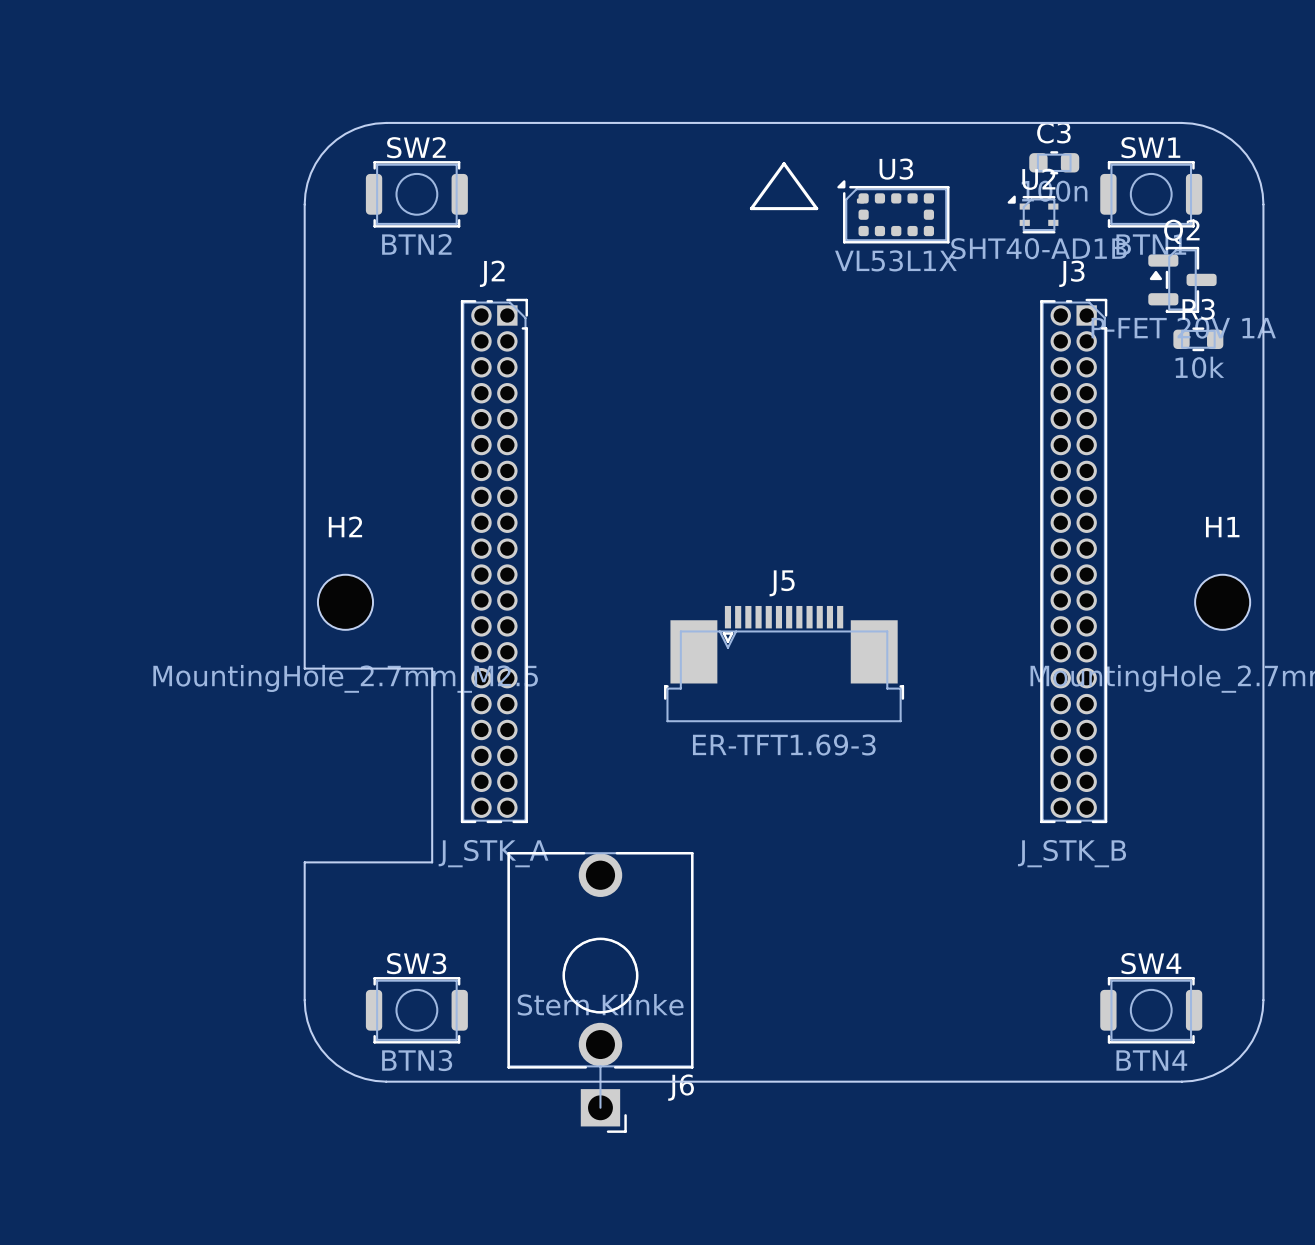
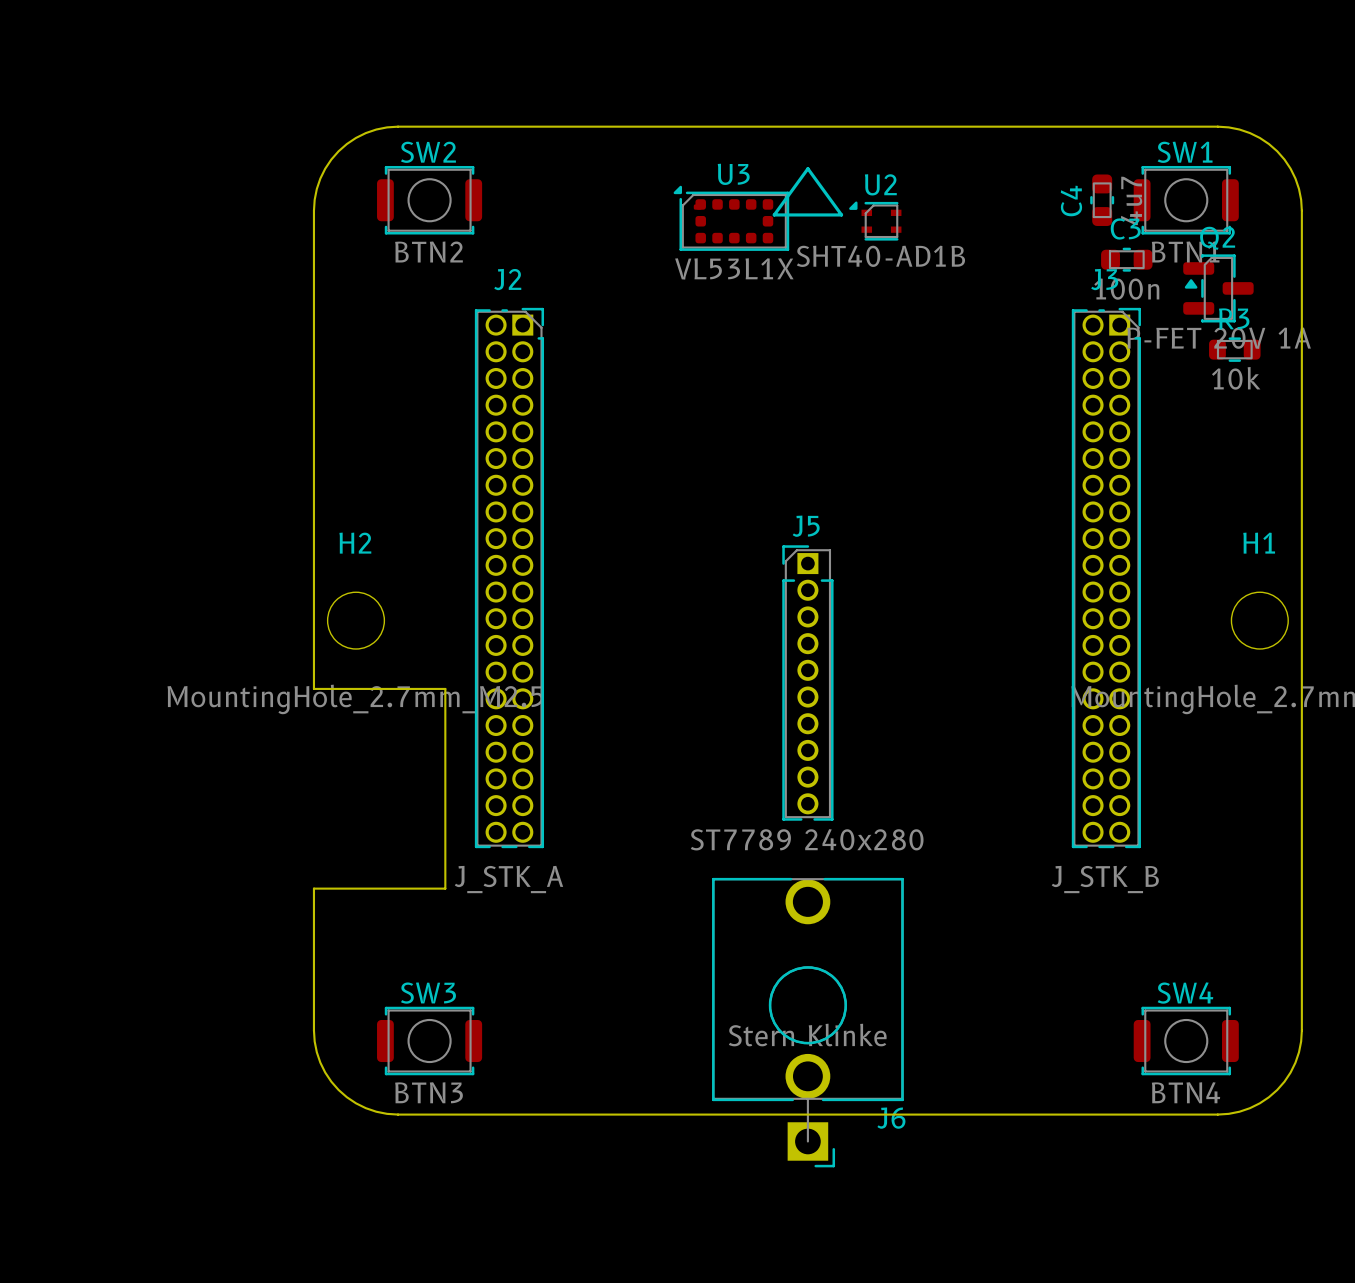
C3 position: (1054, 162) -> (1126, 259)
C4: none -> 4u7 (1102, 200)
U3 position: (893, 211) -> (731, 218)
U2 position: (1033, 214) -> (875, 221)
J5 name position: J5 (782, 583) -> J5 (806, 526)
J5 footprint: [664, 605, 905, 723] -> [782, 545, 834, 821]
J5 value: ER-TFT1.69-3 (784, 744) -> ST7789 240x280 (807, 839)
J6 position: (600, 992) -> (807, 1022)

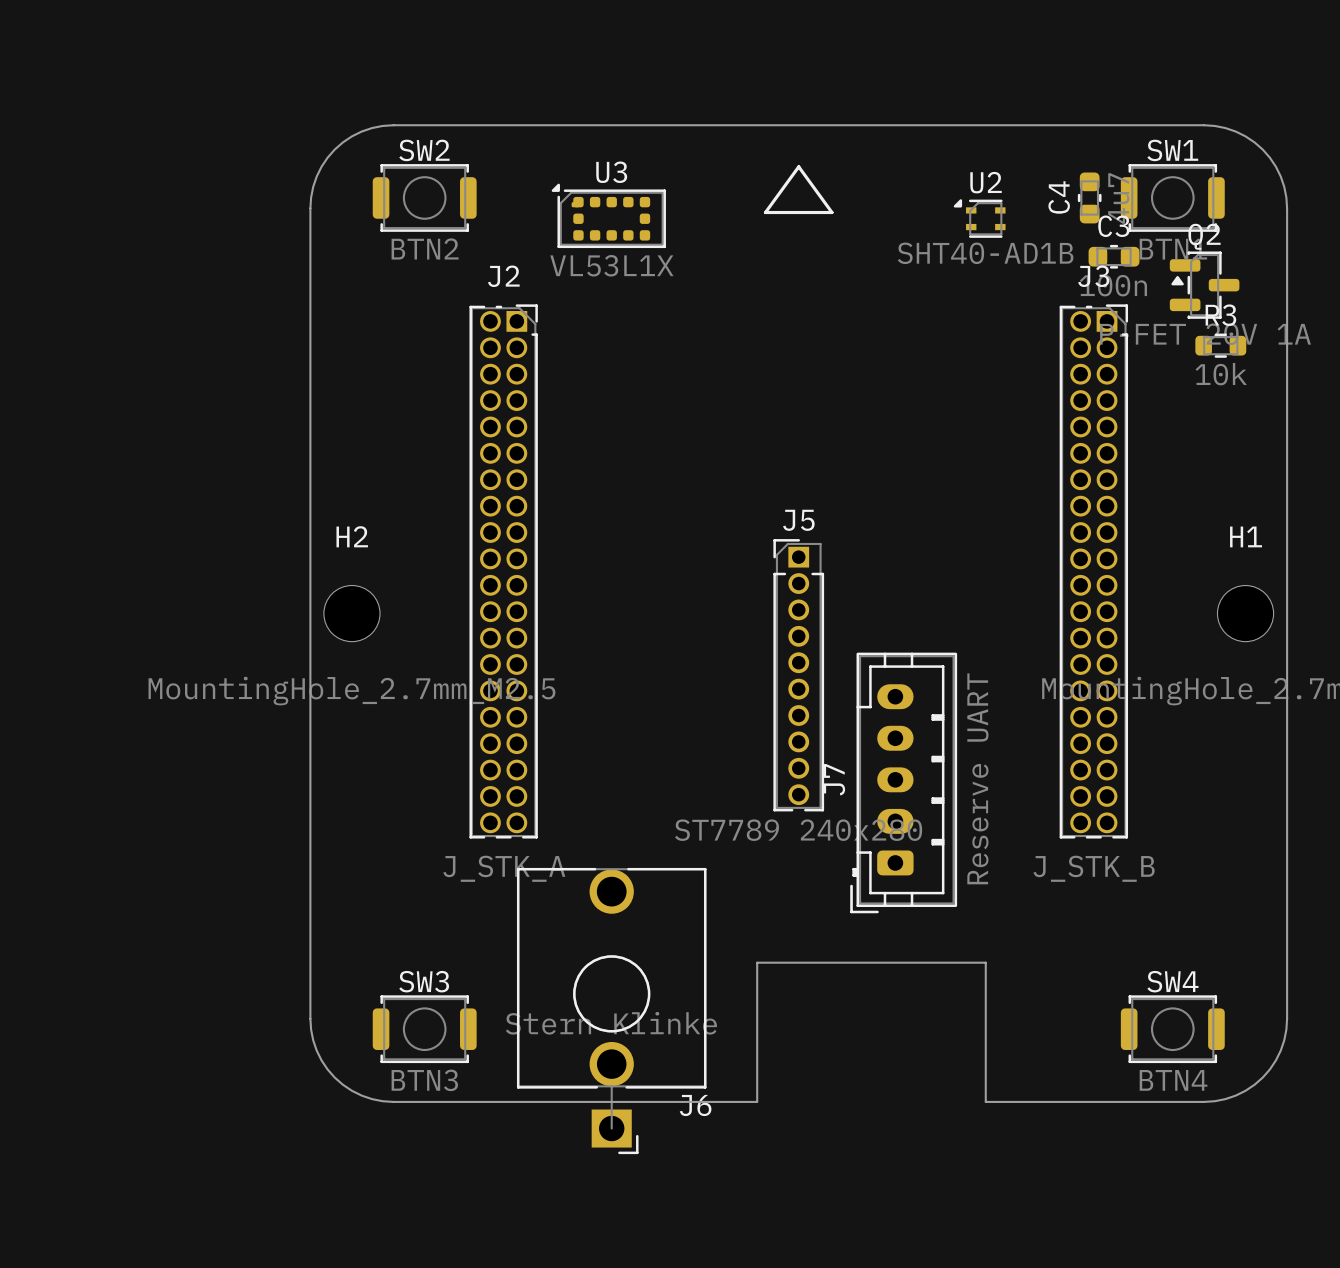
U3 position: (731, 218) -> (608, 215)
U2 position: (875, 221) -> (979, 218)
board edge: (313, 688) (445, 688) (445, 888) (313, 888) -> (310, 681) (310, 878)
J7: none -> Reserve UART (903, 782)
J6 position: (807, 1022) -> (611, 1011)
board edge: (765, 1114) (997, 1114) -> (757, 1101) (757, 962) (985, 962) (985, 1101)

